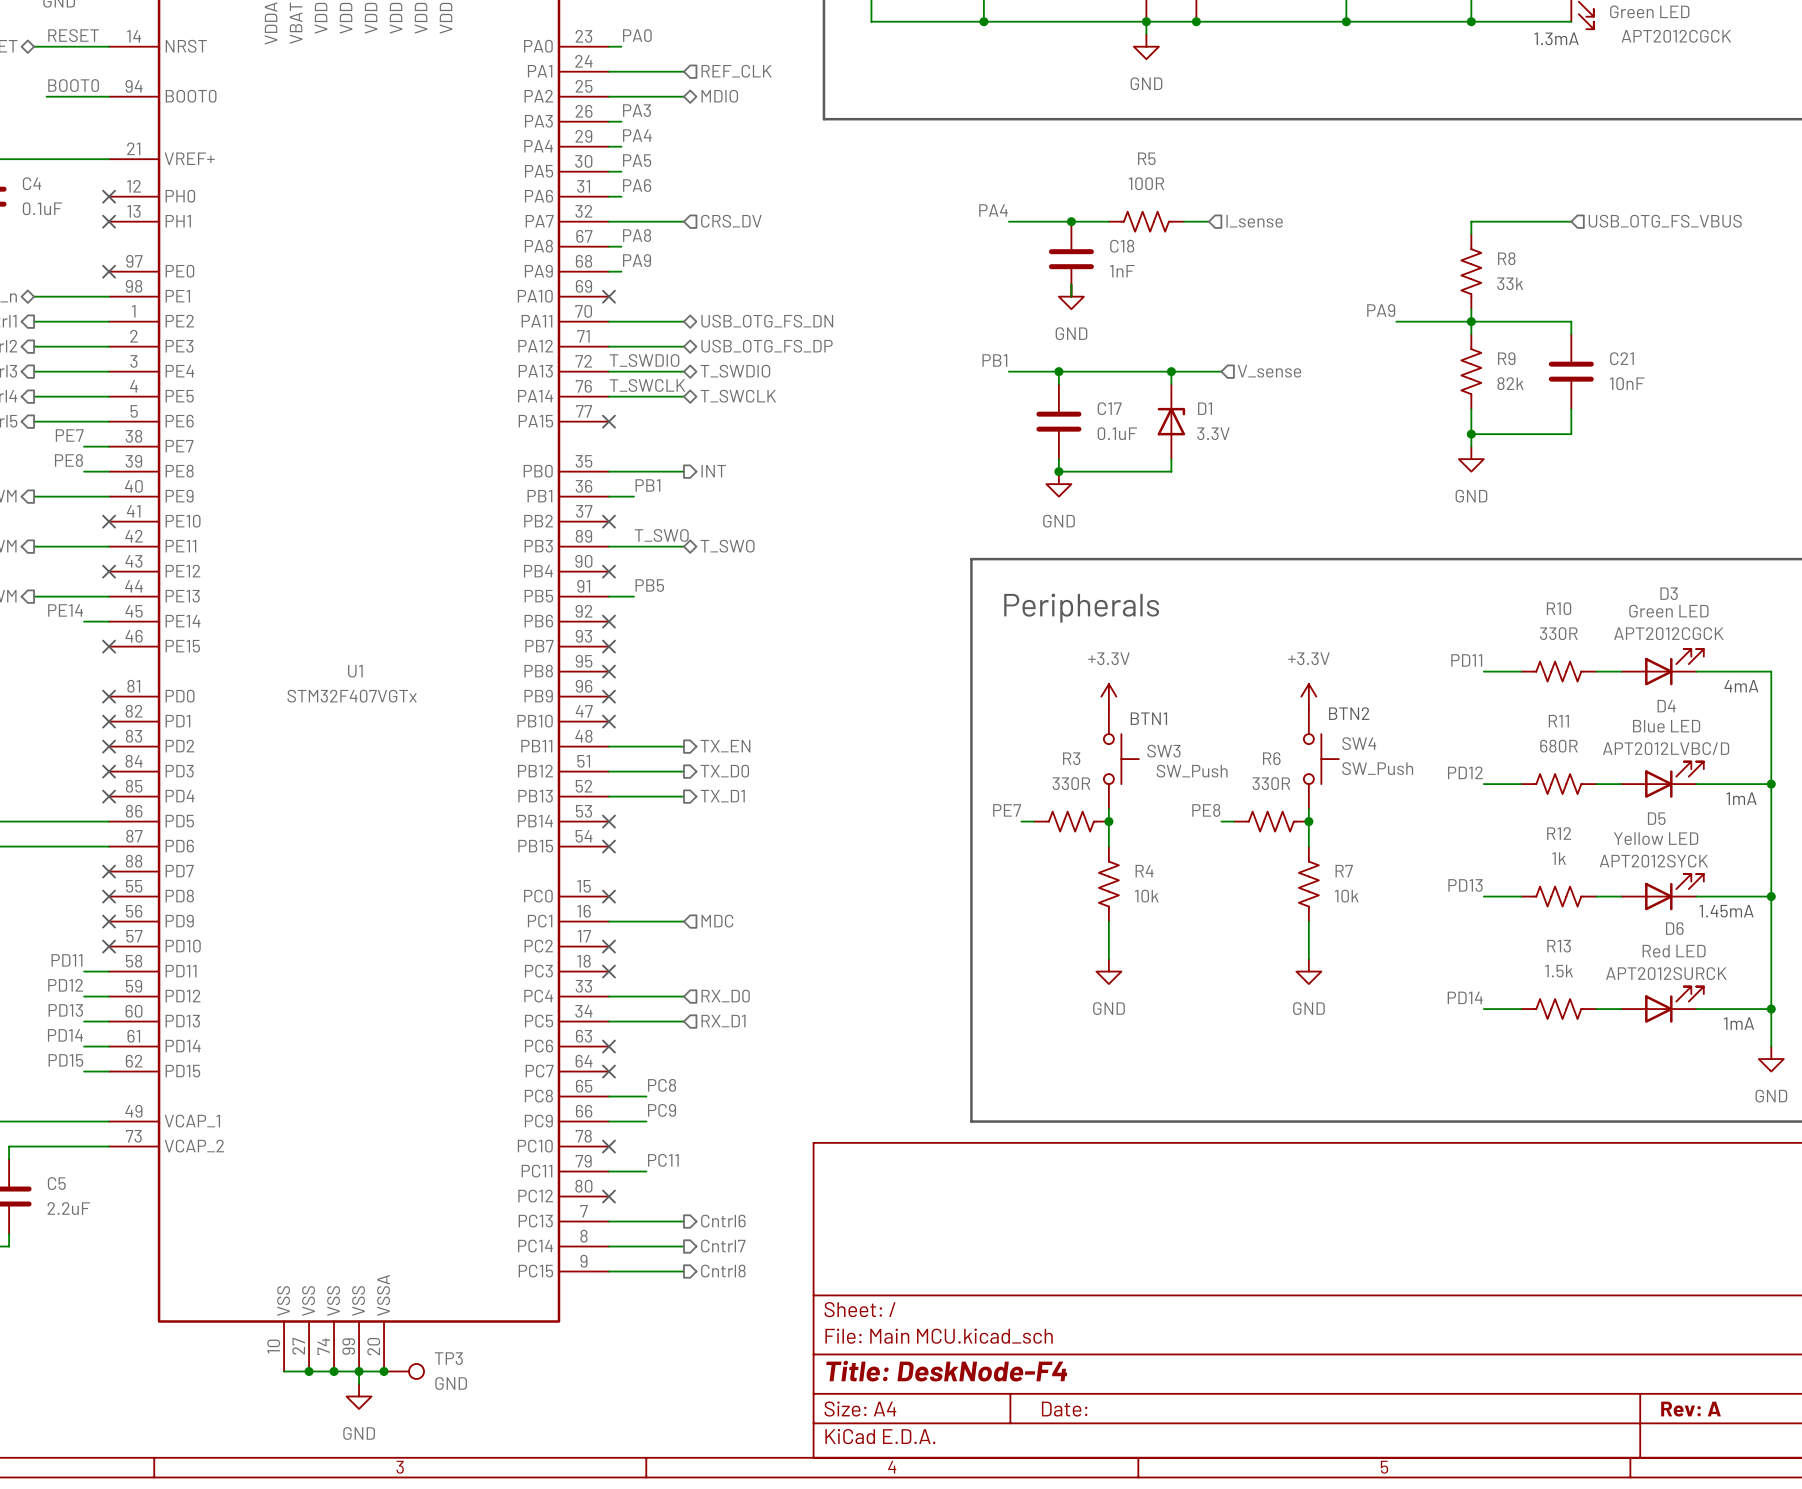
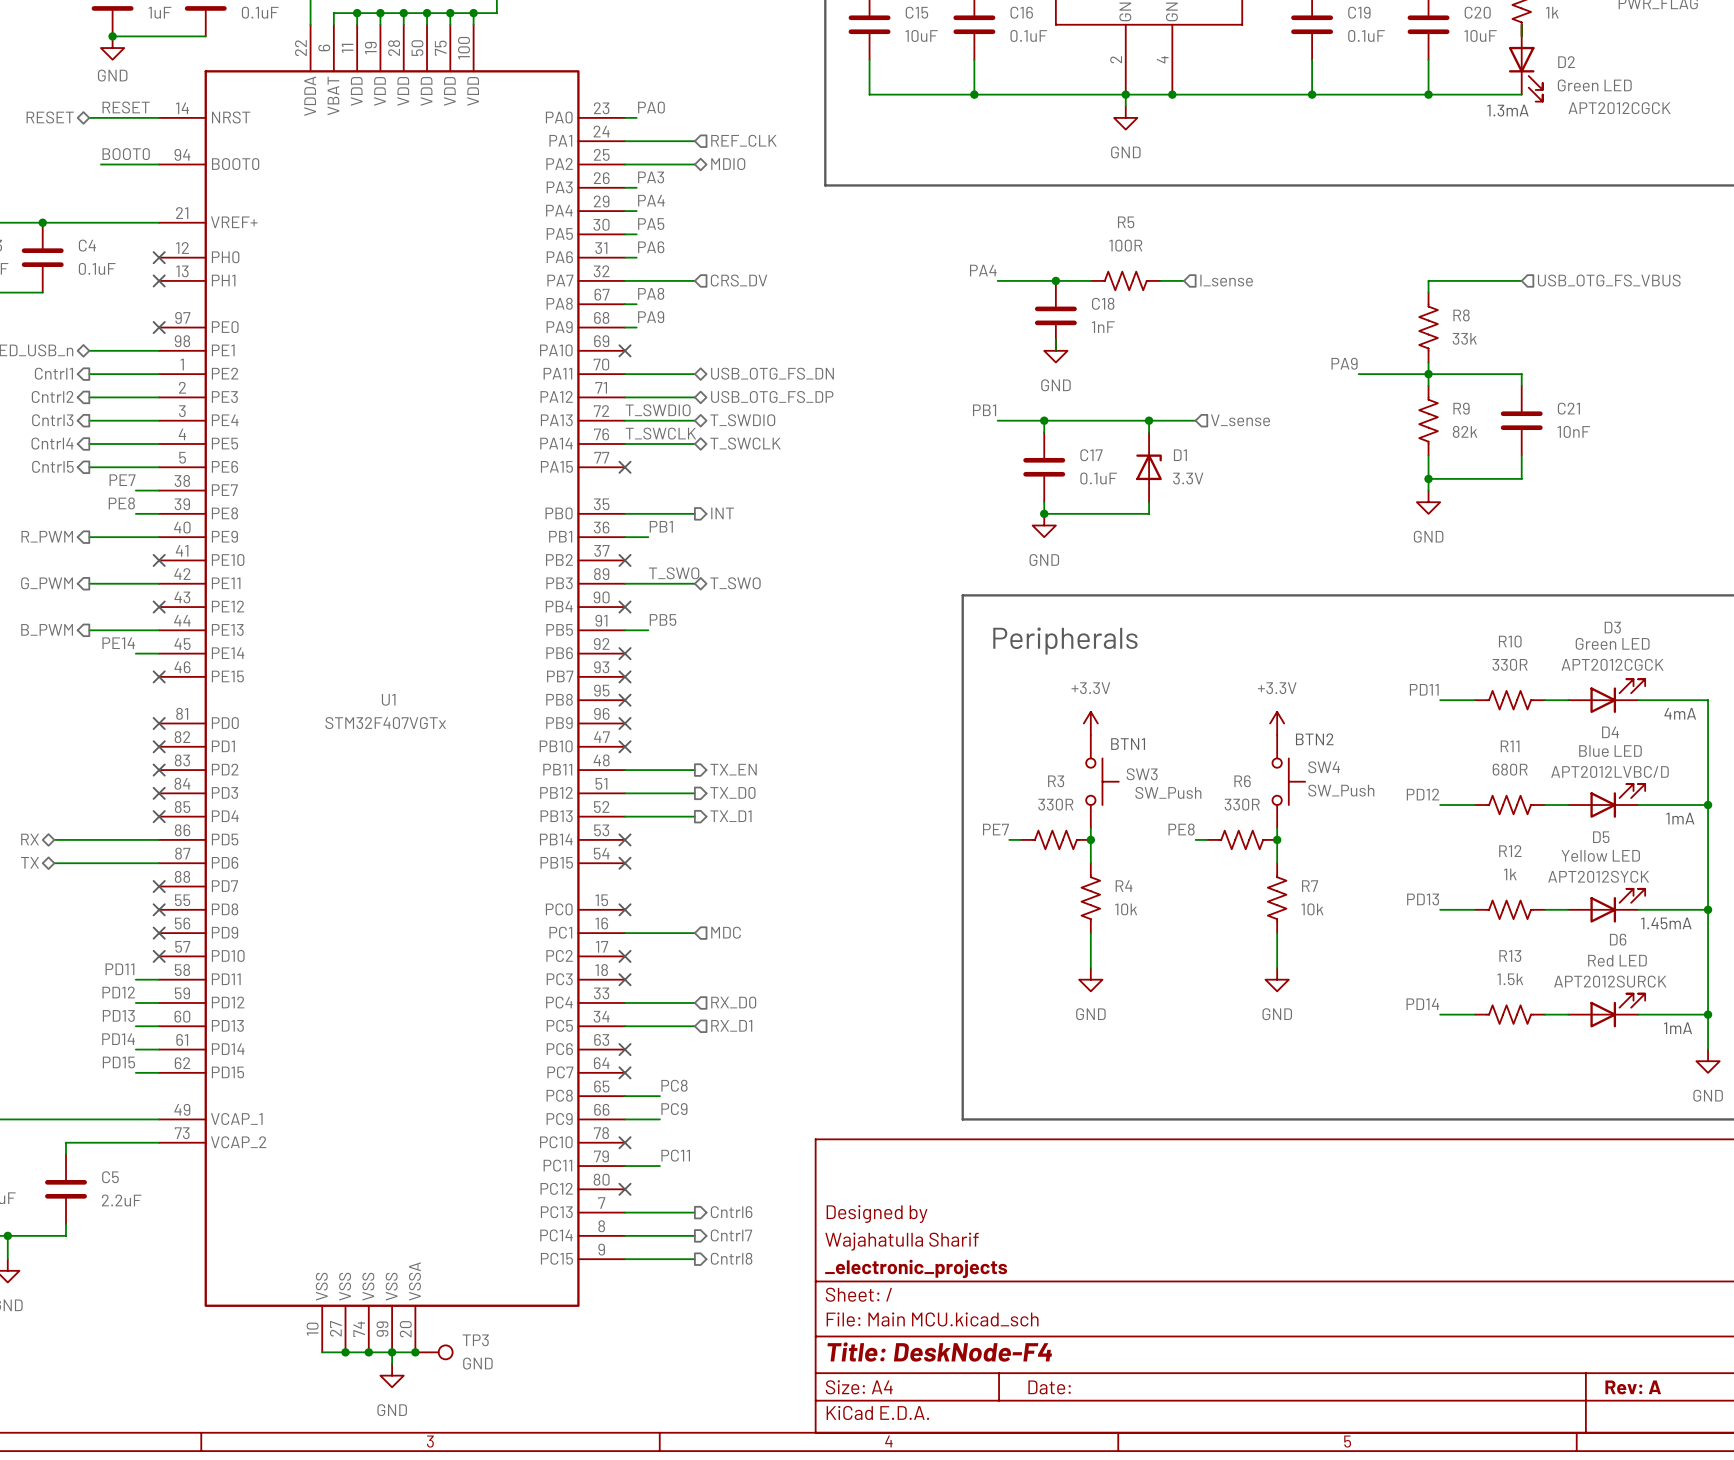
title block: none -> Designed by (877, 1214)
title block: none -> Wajahatulla Sharif (902, 1241)
title block: none -> _electronic_projects (916, 1268)

